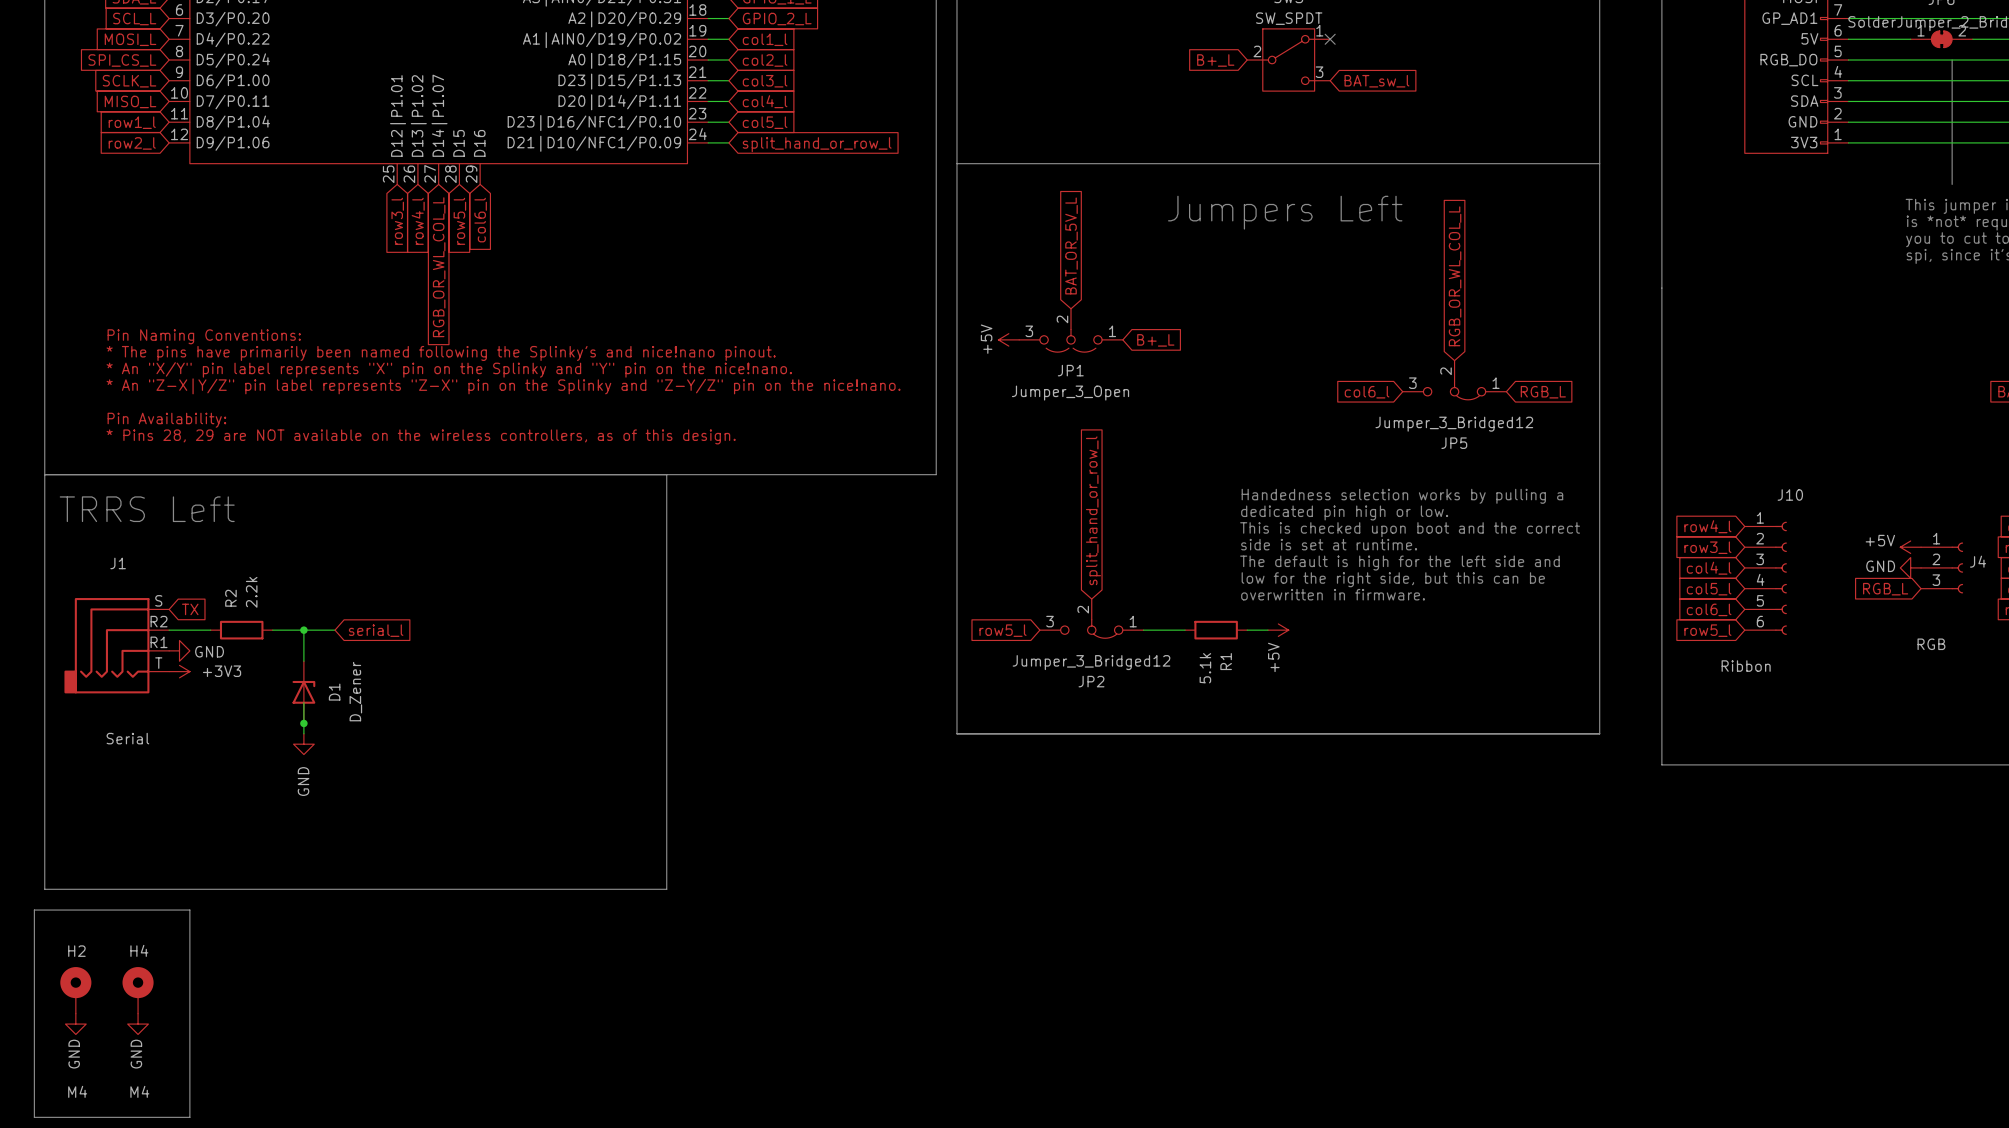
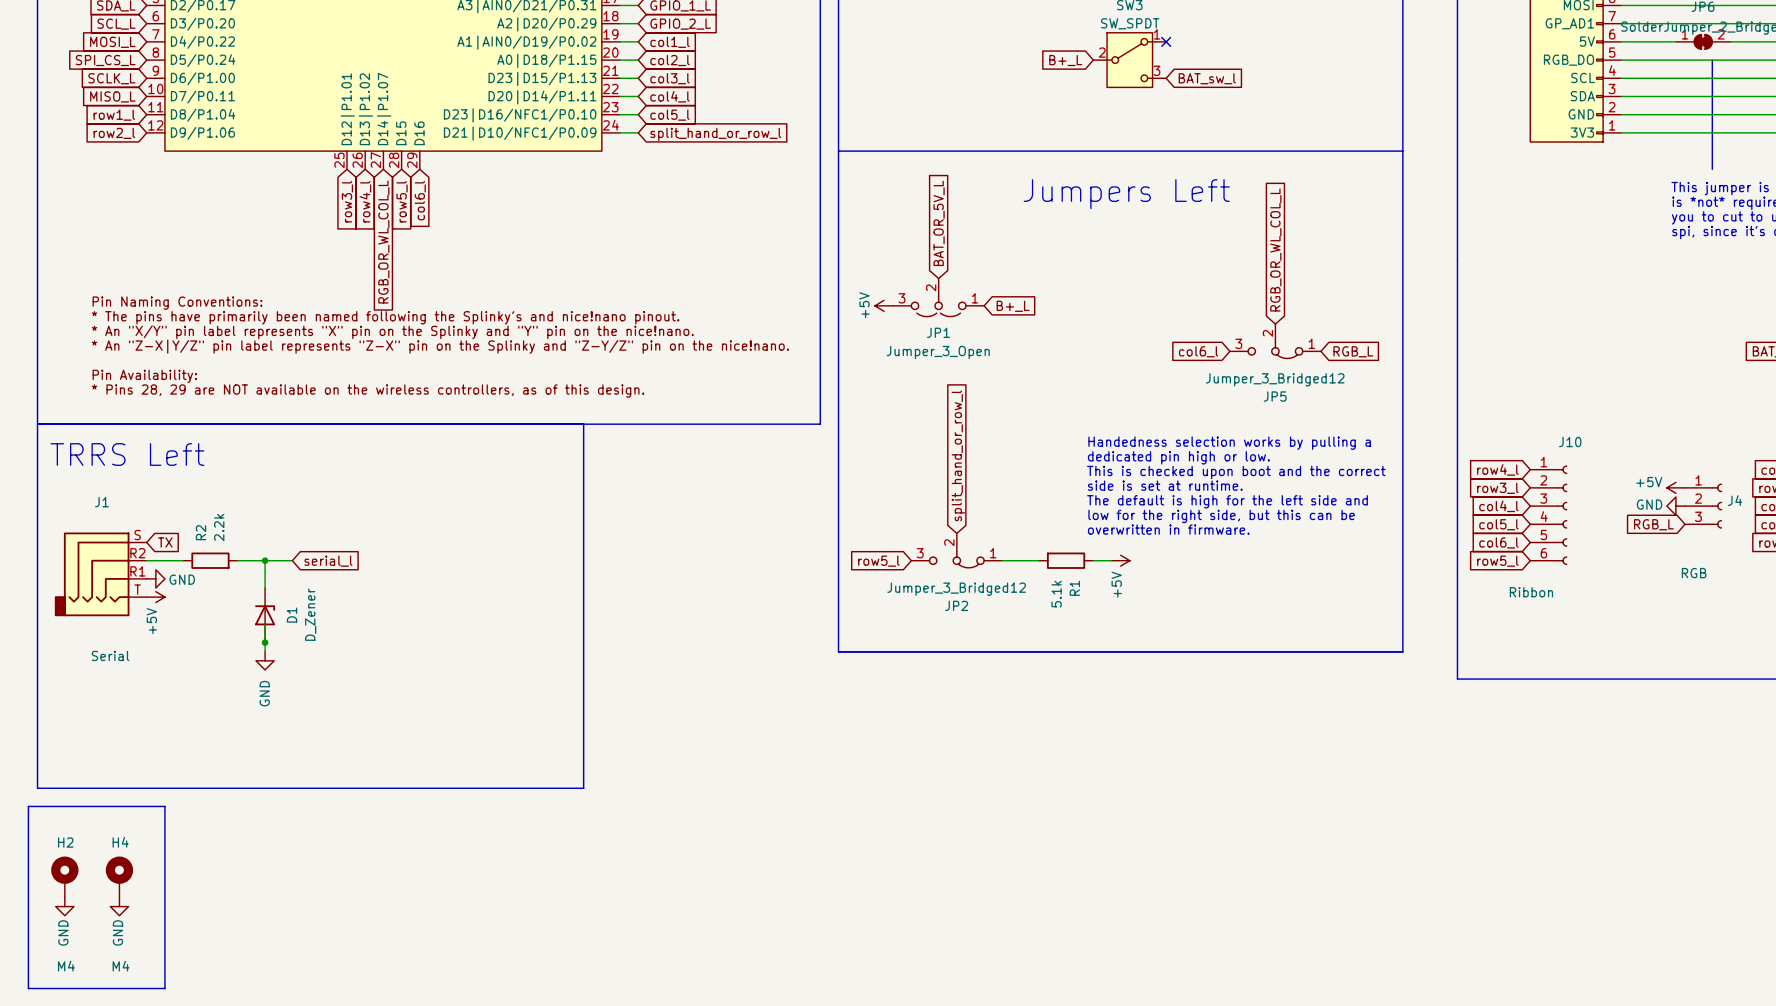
power symbol: +3V3 (179, 671) -> +5V (155, 597)

